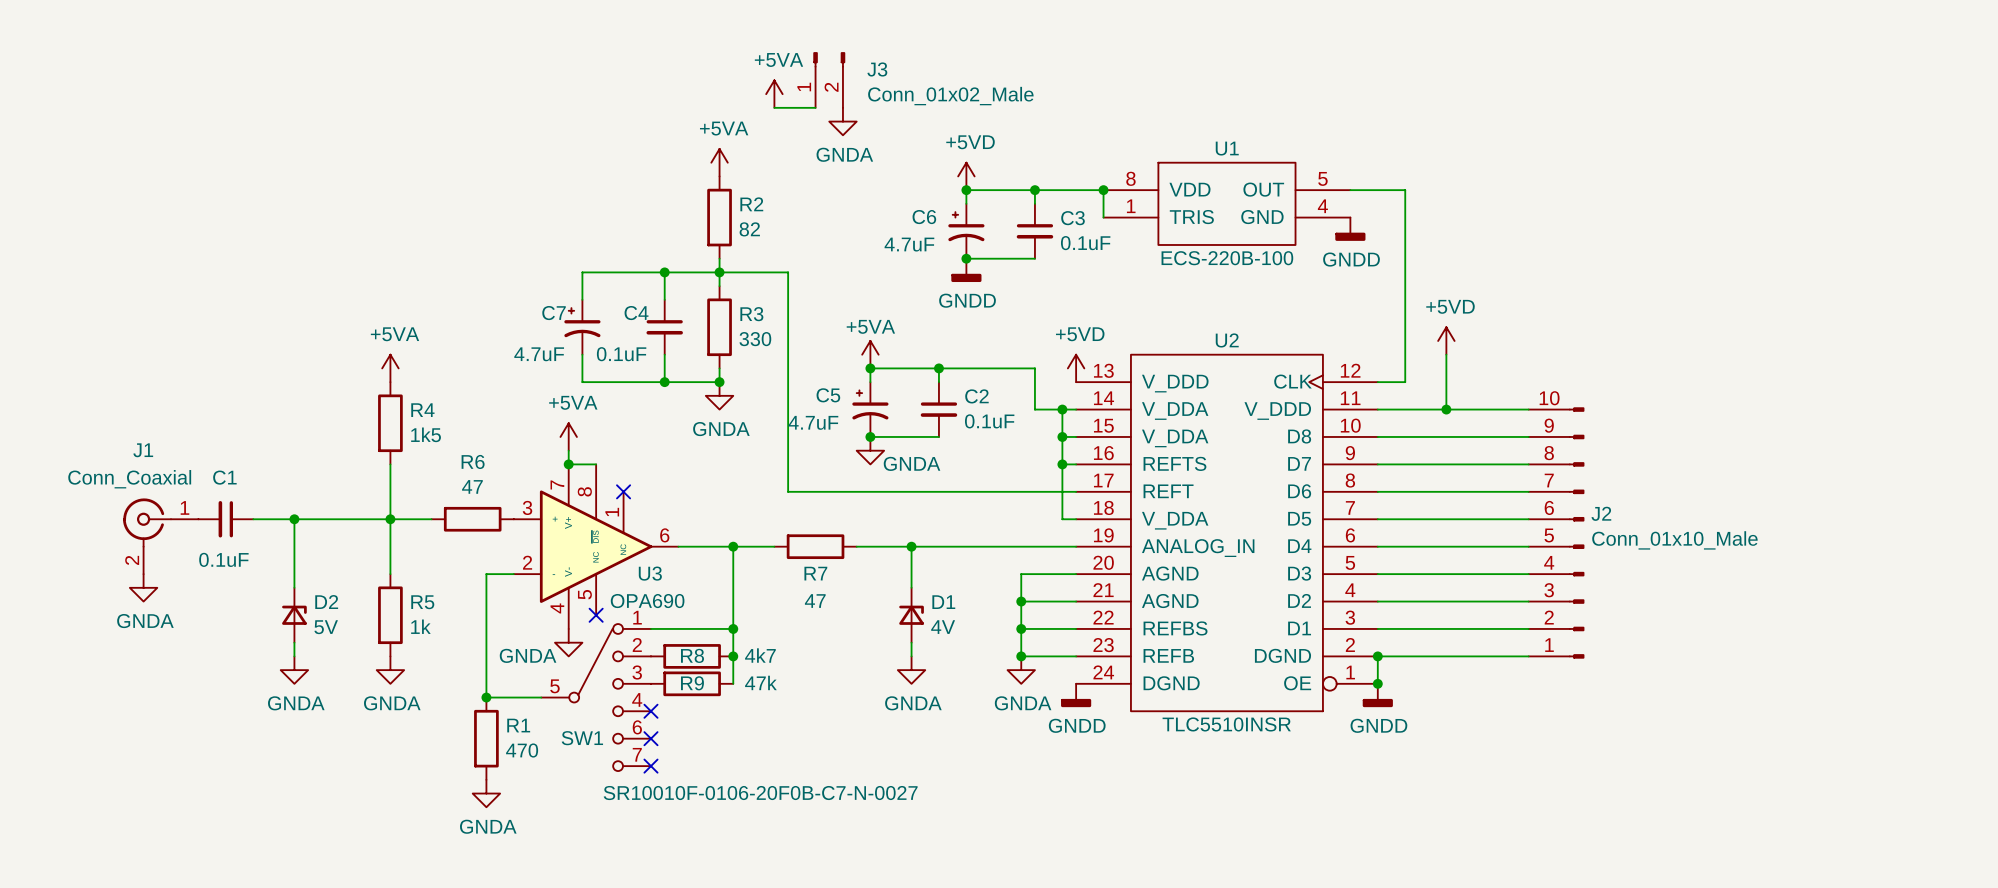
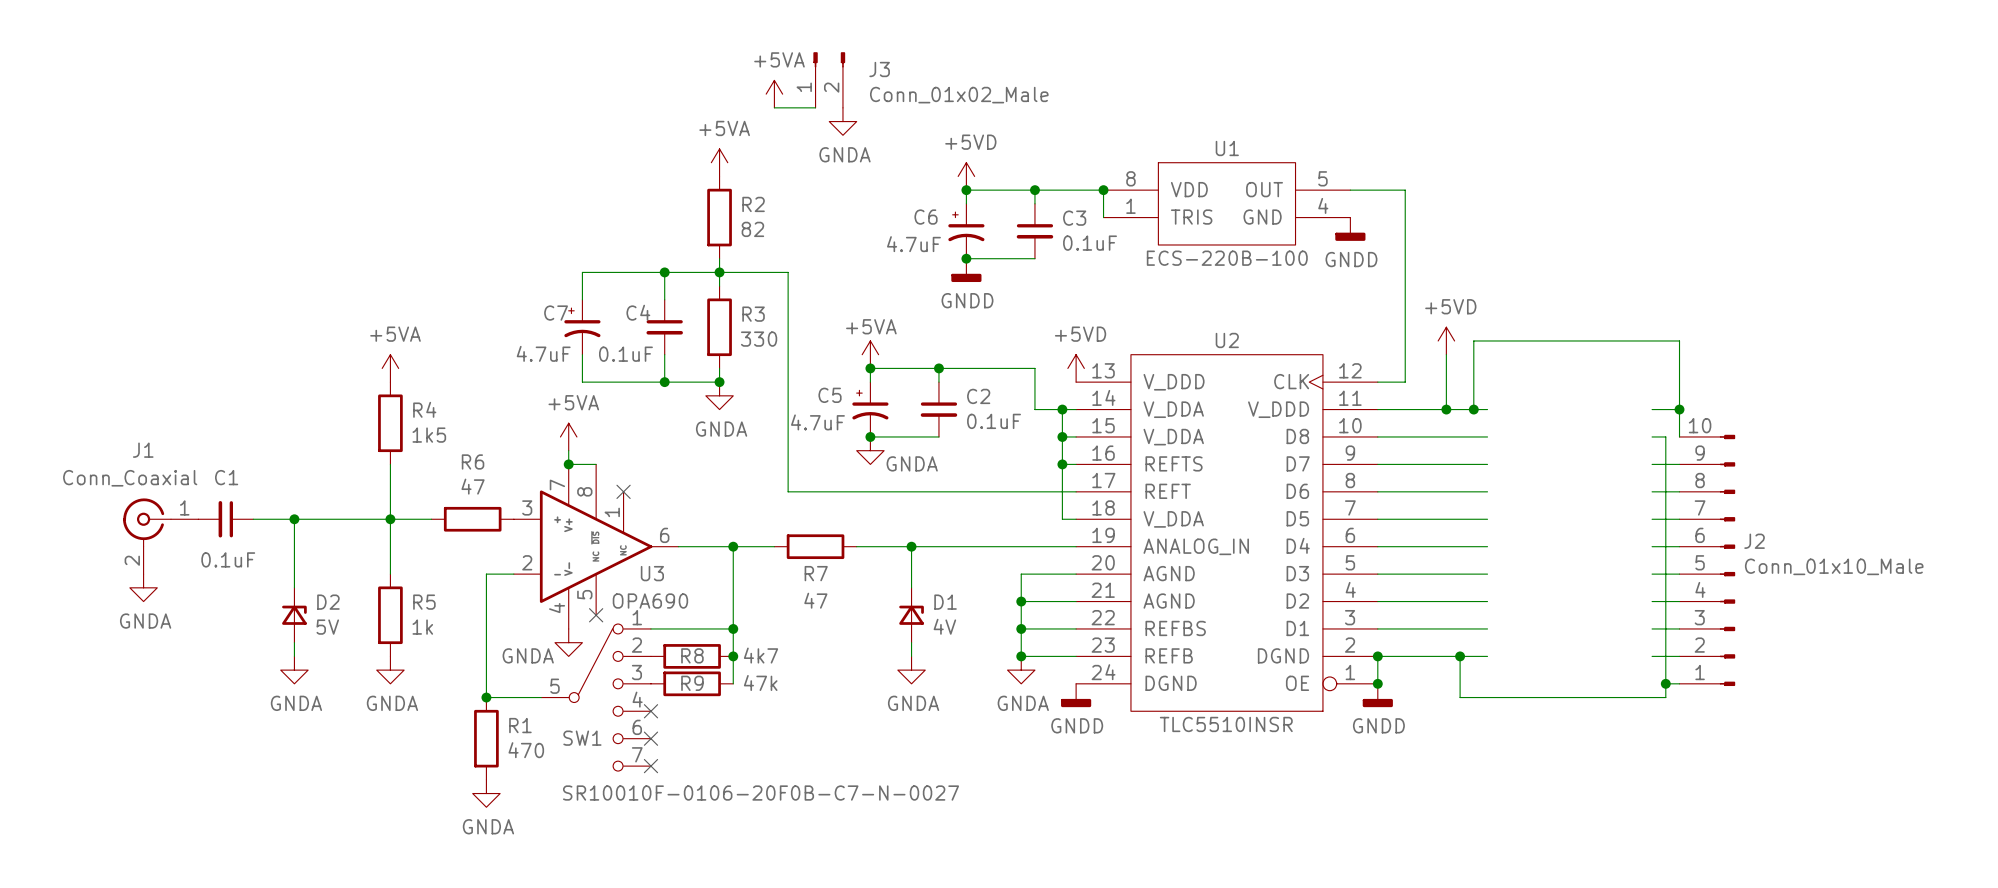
wire: none -> (1473, 409) (1473, 340) (1679, 340) (1679, 436)
junction: none -> (1473, 409)
wire: (1487, 409) (1528, 409) -> none
wire: none -> (1652, 409) (1679, 409)
junction: none -> (1679, 409)
wire: (1487, 436) (1528, 436) -> none
wire: none -> (1652, 436) (1665, 436) (1665, 697) (1460, 697) (1460, 656)
wire: (1487, 464) (1528, 464) -> none
wire: none -> (1652, 464) (1679, 464)
wire: (1487, 491) (1528, 491) -> none
wire: none -> (1652, 491) (1679, 491)
wire: (1487, 519) (1528, 519) -> none
wire: none -> (1652, 519) (1679, 519)
J2 position: (1556, 532) -> (1707, 560)
wire: (1487, 546) (1528, 546) -> none
wire: none -> (1652, 546) (1679, 546)
wire: (1487, 574) (1528, 574) -> none
wire: none -> (1652, 574) (1679, 574)
wire: (1487, 601) (1528, 601) -> none
wire: none -> (1652, 601) (1679, 601)
wire: (1487, 628) (1528, 628) -> none
wire: none -> (1652, 628) (1679, 628)
junction: none -> (1460, 656)
wire: (1487, 656) (1528, 656) -> none
wire: none -> (1652, 656) (1679, 656)
wire: none -> (1665, 683) (1679, 683)
junction: none -> (1665, 683)

